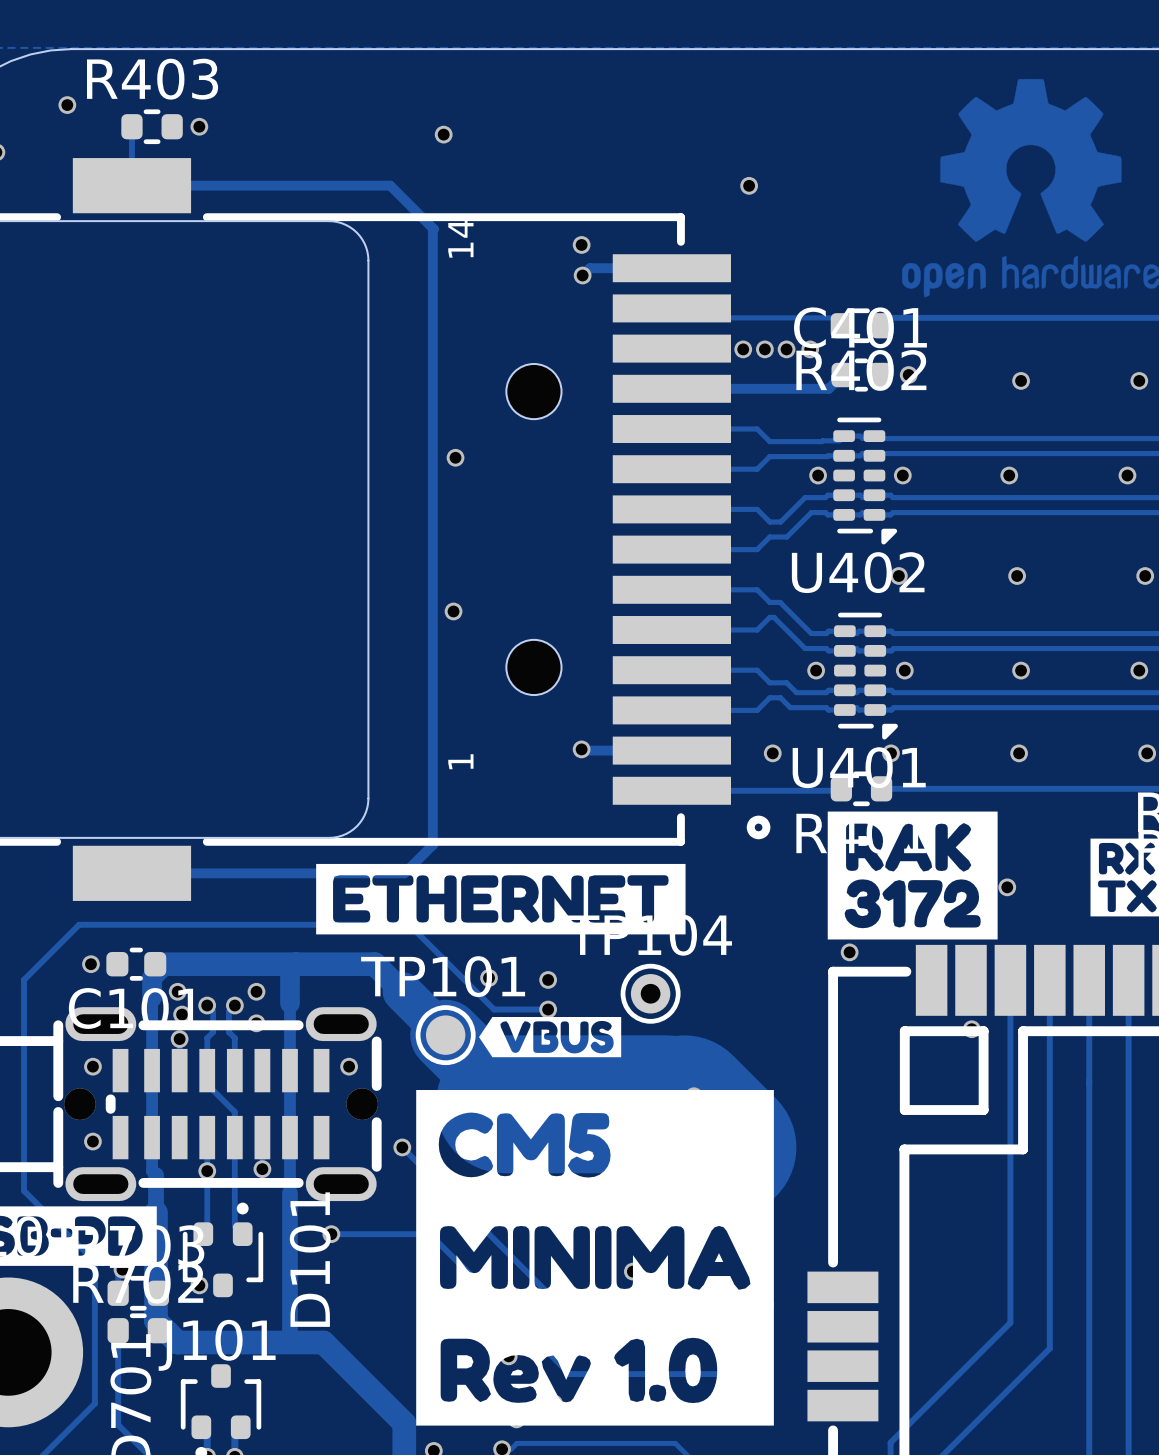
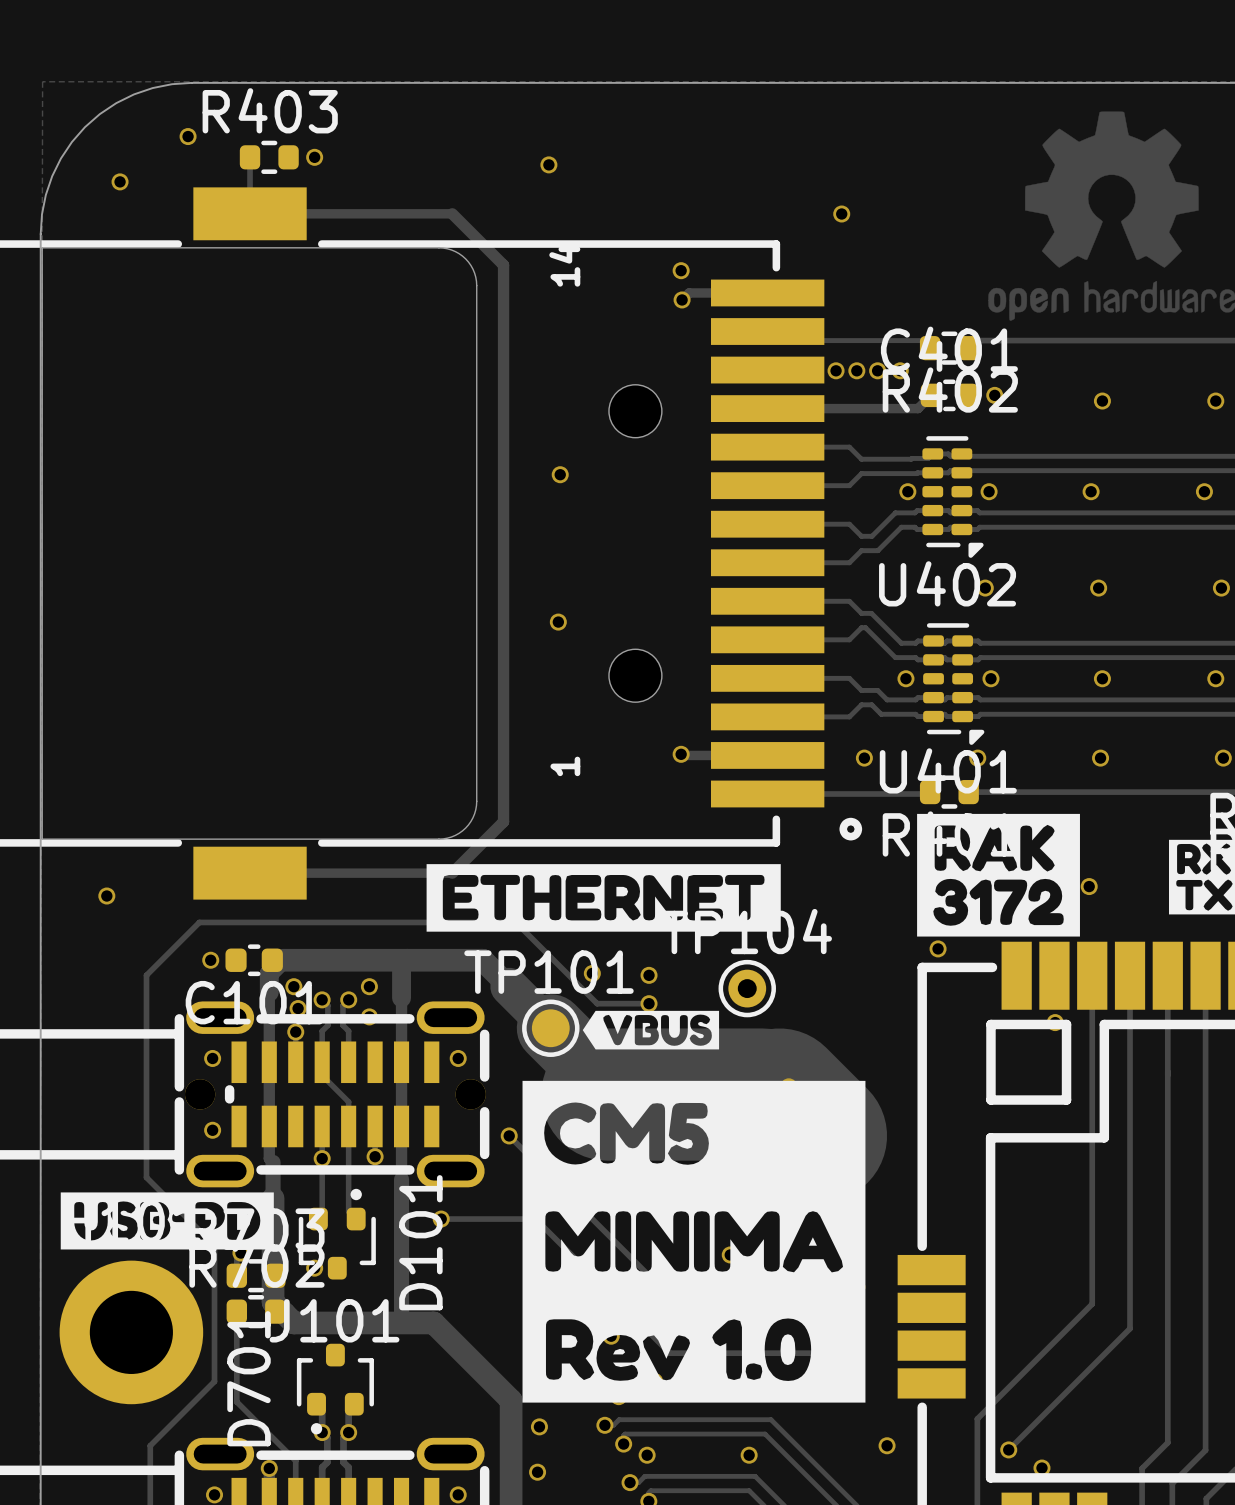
track: (342, 185) (390, 185) (433, 229) (432, 844) (404, 873) (342, 873) -> (452, 213) (503, 265) (503, 821) (452, 873)

